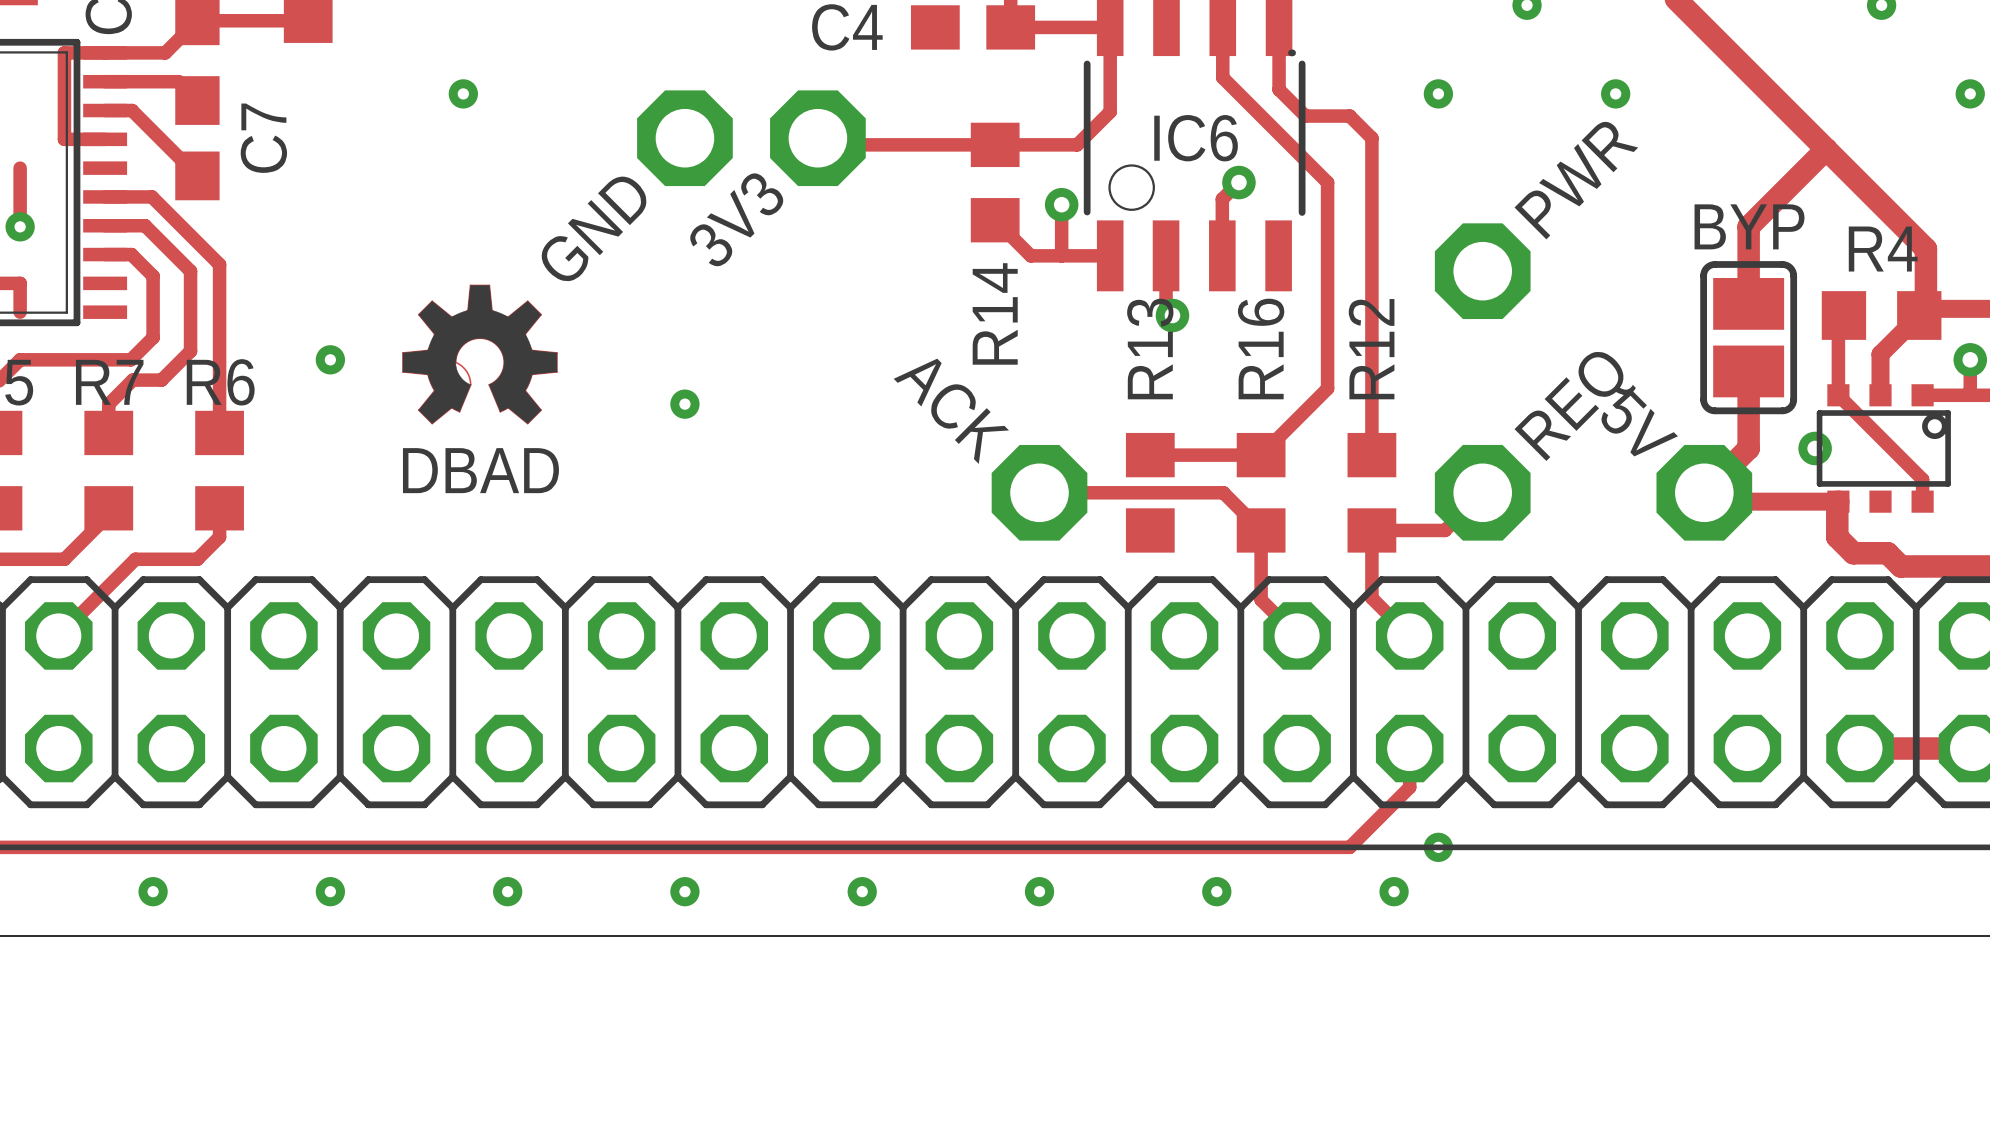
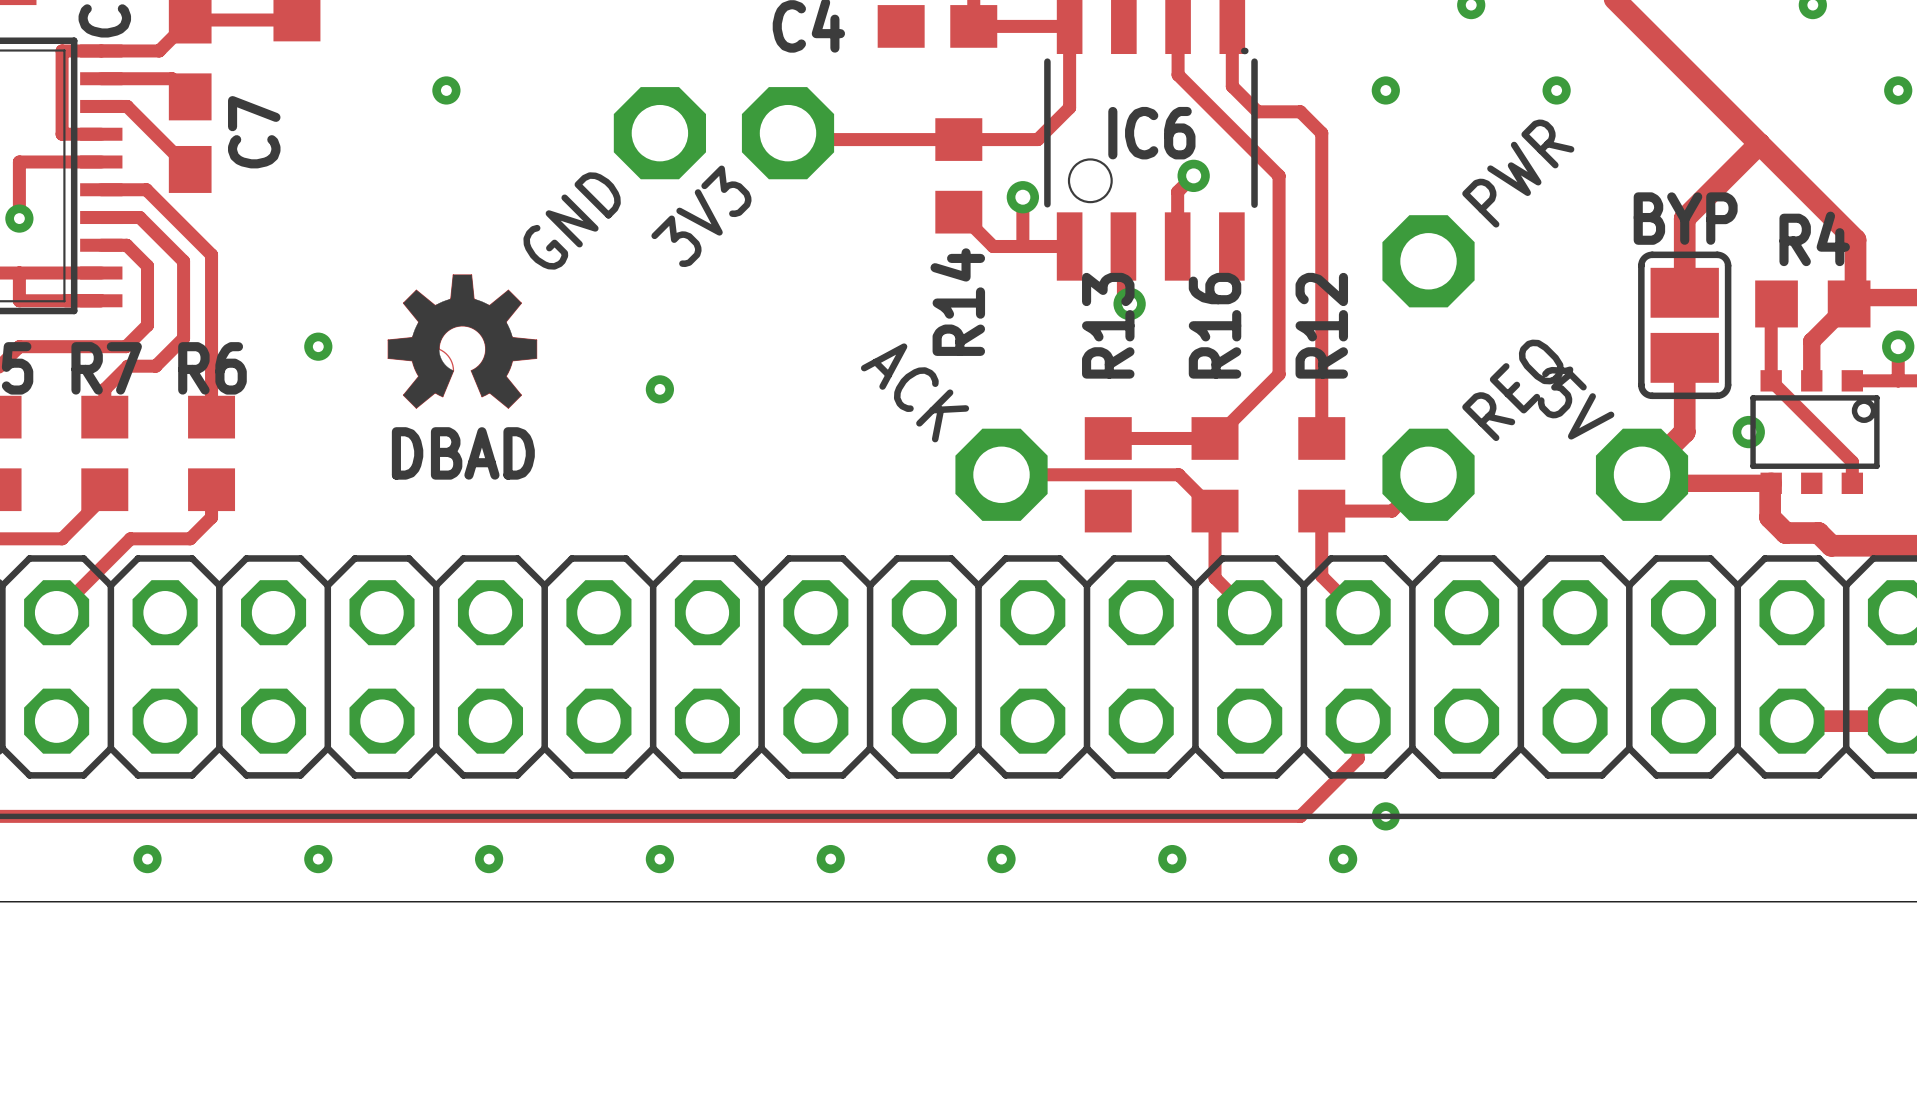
track: none -> (19, 161) (101, 161)
track: none -> (19, 273) (101, 273)
track: none -> (19, 300) (101, 300)

